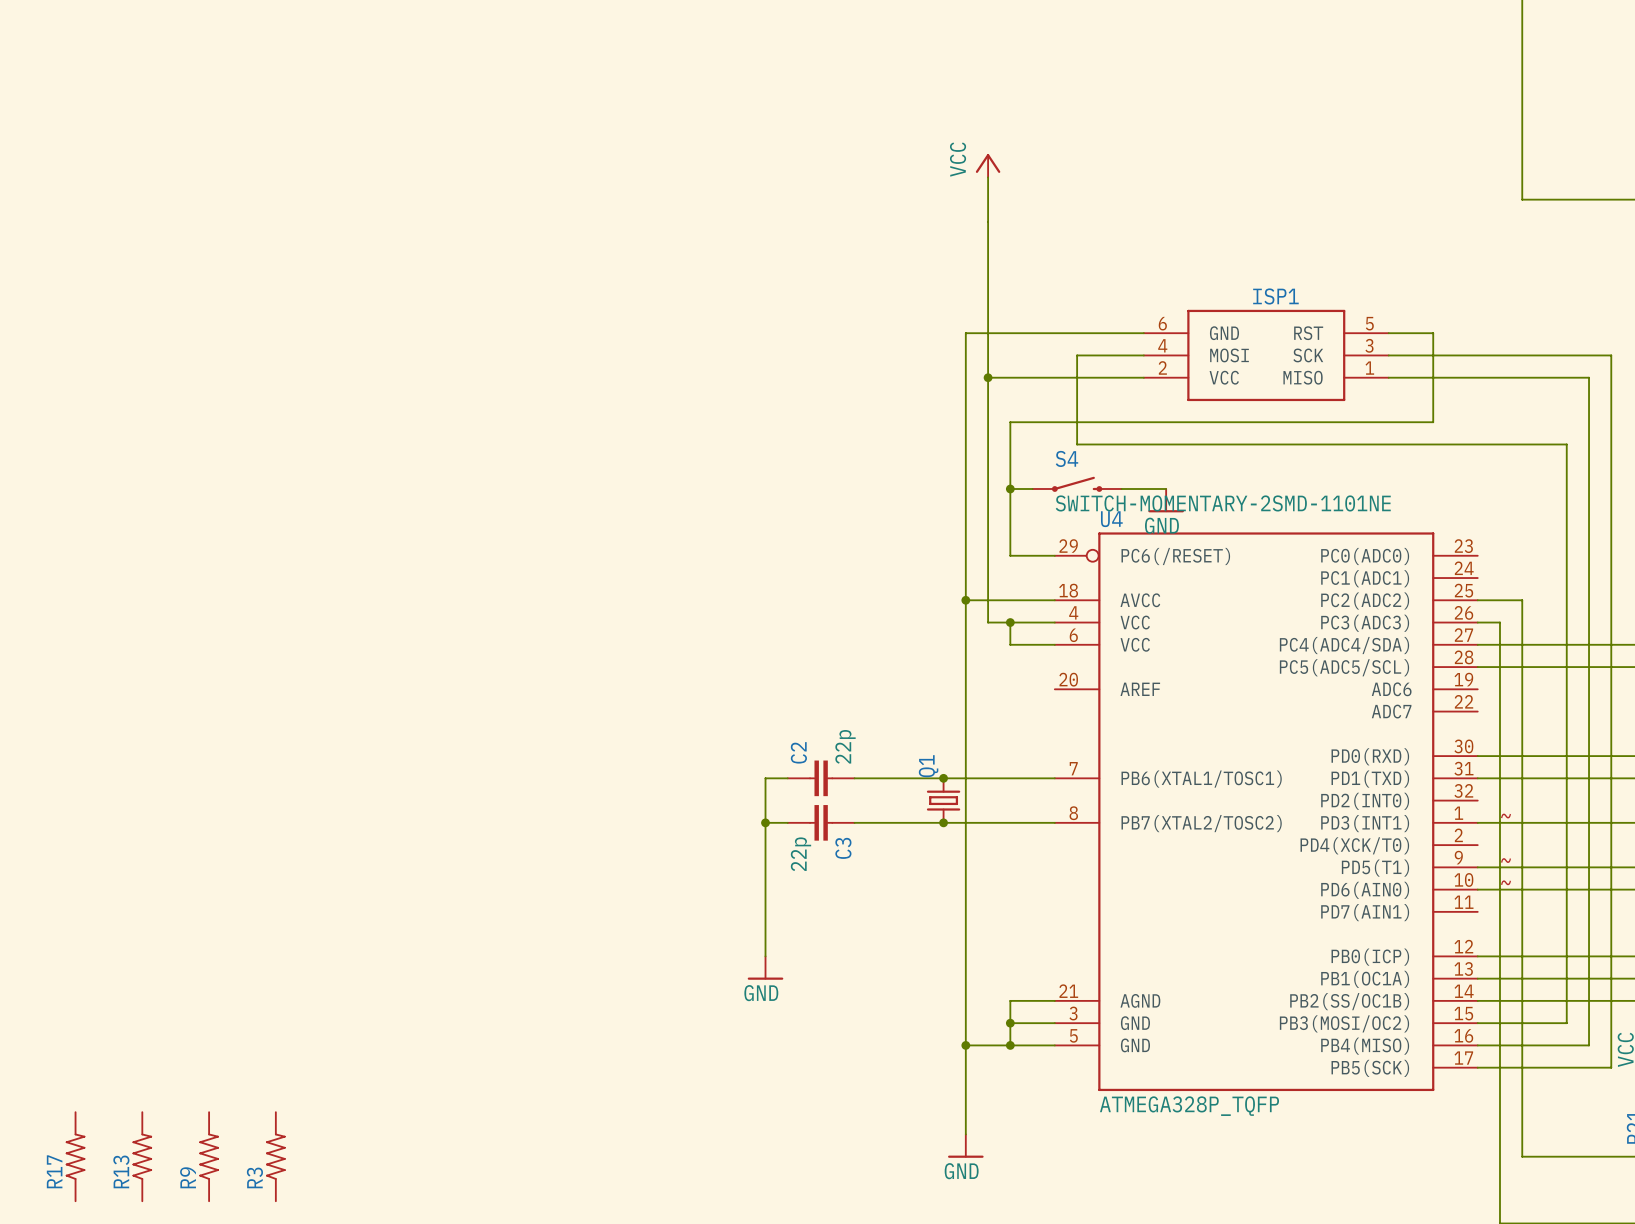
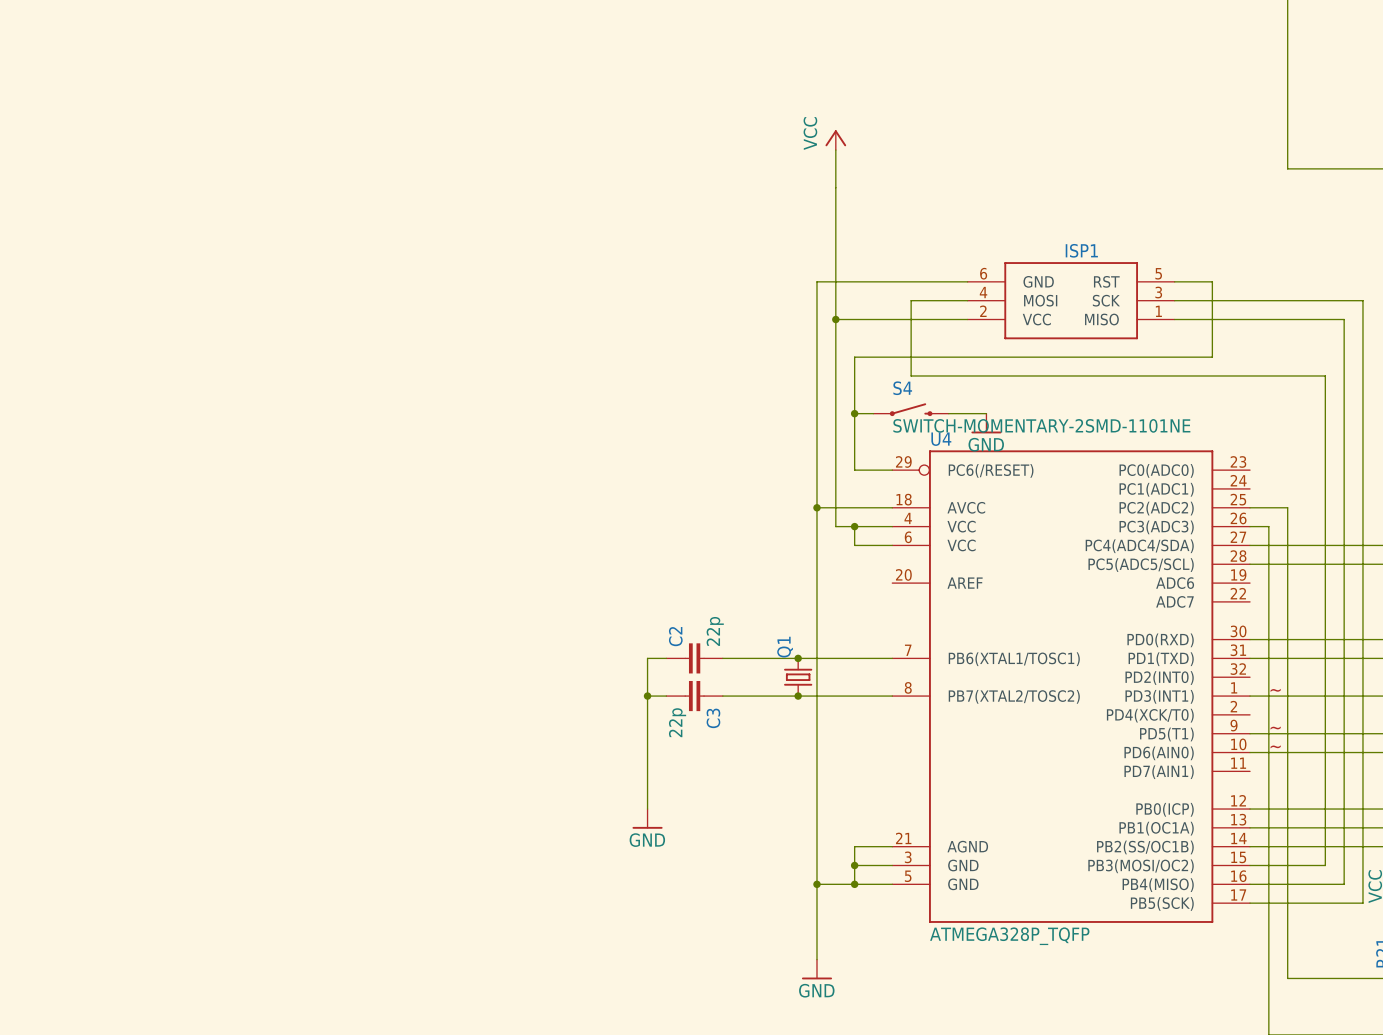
R17: (75, 1156) -> none
R13: (142, 1156) -> none
R9: (209, 1156) -> none
R3: (275, 1156) -> none

